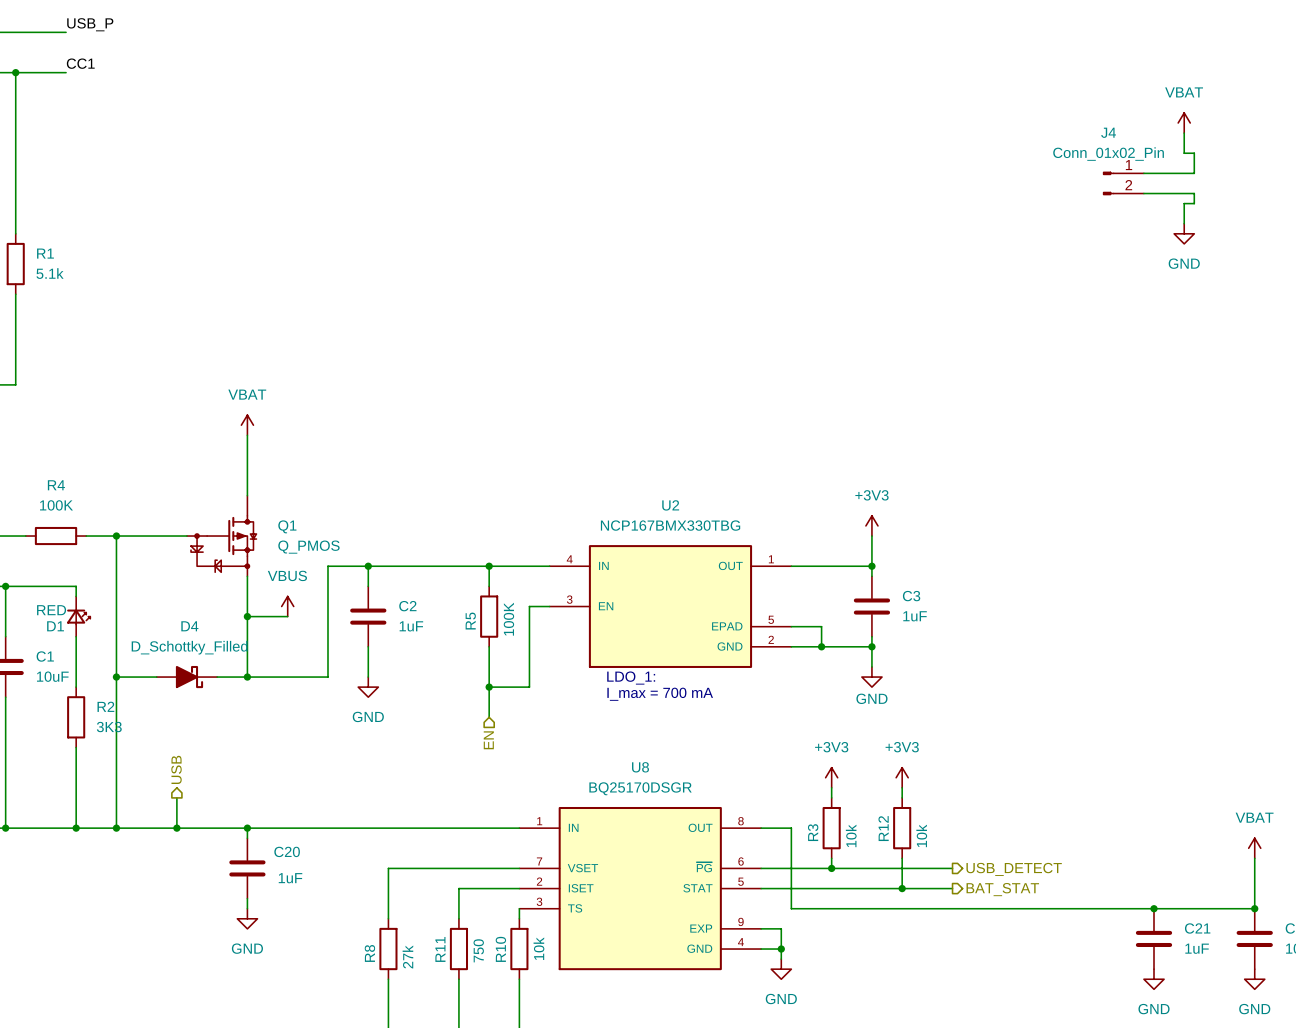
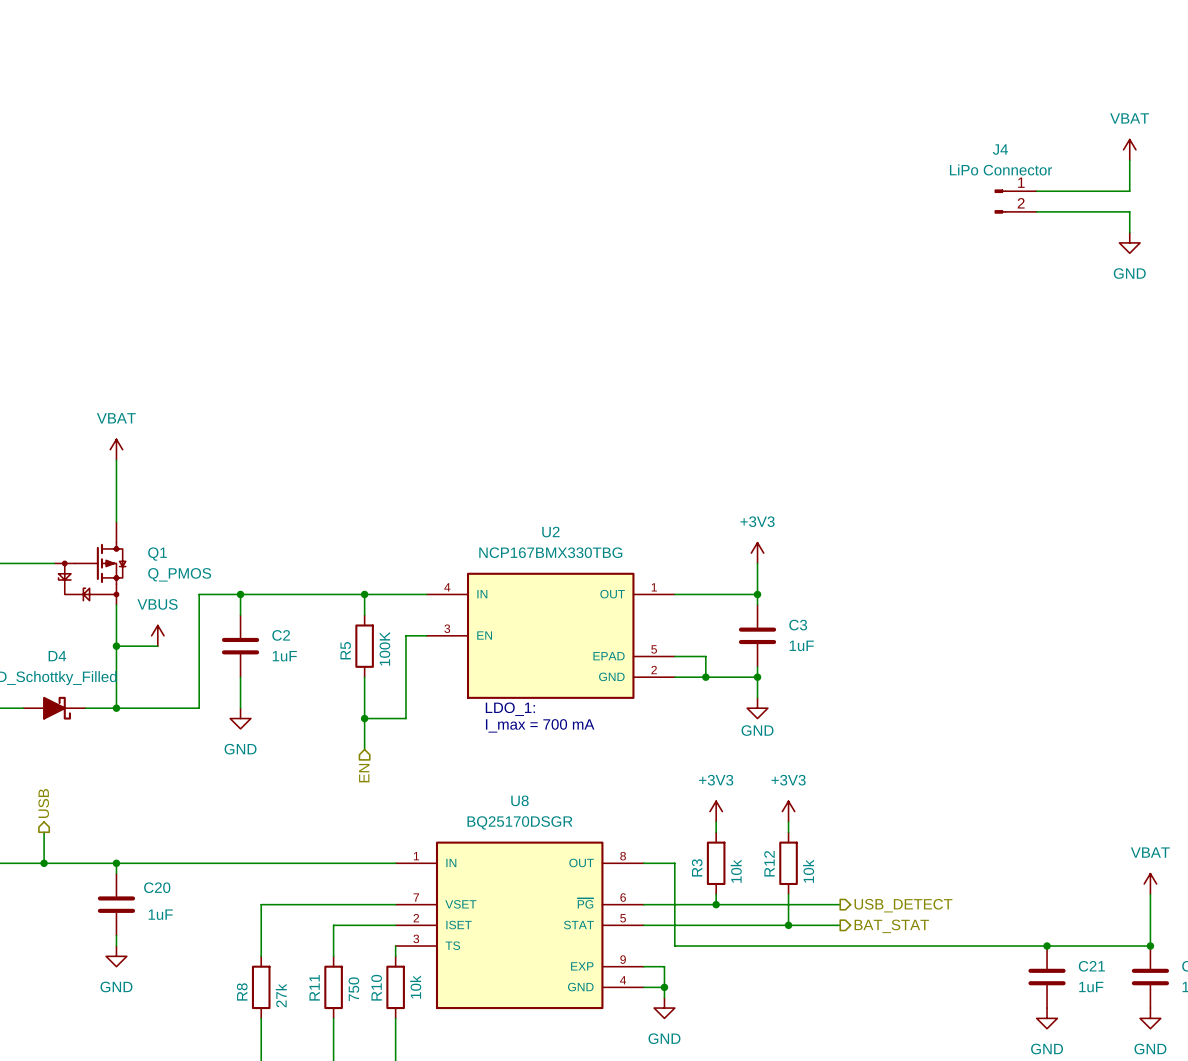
power symbol position: VBAT (1184, 123) -> VBAT (1129, 149)
wire: (1184, 133) (1184, 153) (1194, 153) (1194, 173) -> (1129, 160) (1129, 191) (1088, 191)
J4 value: Conn_01x02_Pin (1108, 154) -> LiPo Connector (1000, 169)
wire: (1194, 193) (1194, 203) (1184, 203) (1184, 223) -> (1088, 211) (1129, 211) (1129, 232)
power symbol position: GND (1184, 233) -> GND (1129, 242)

